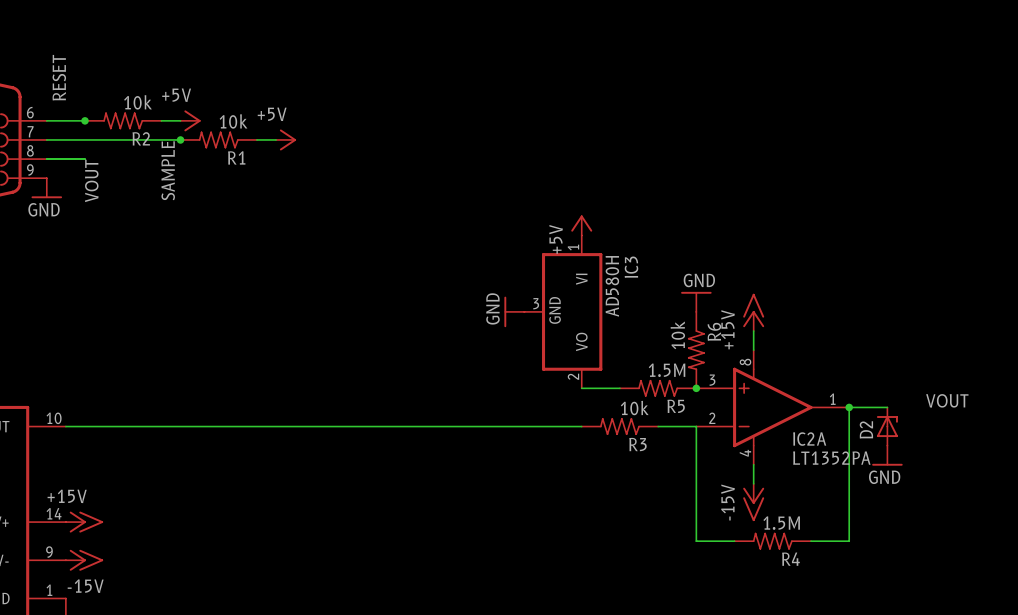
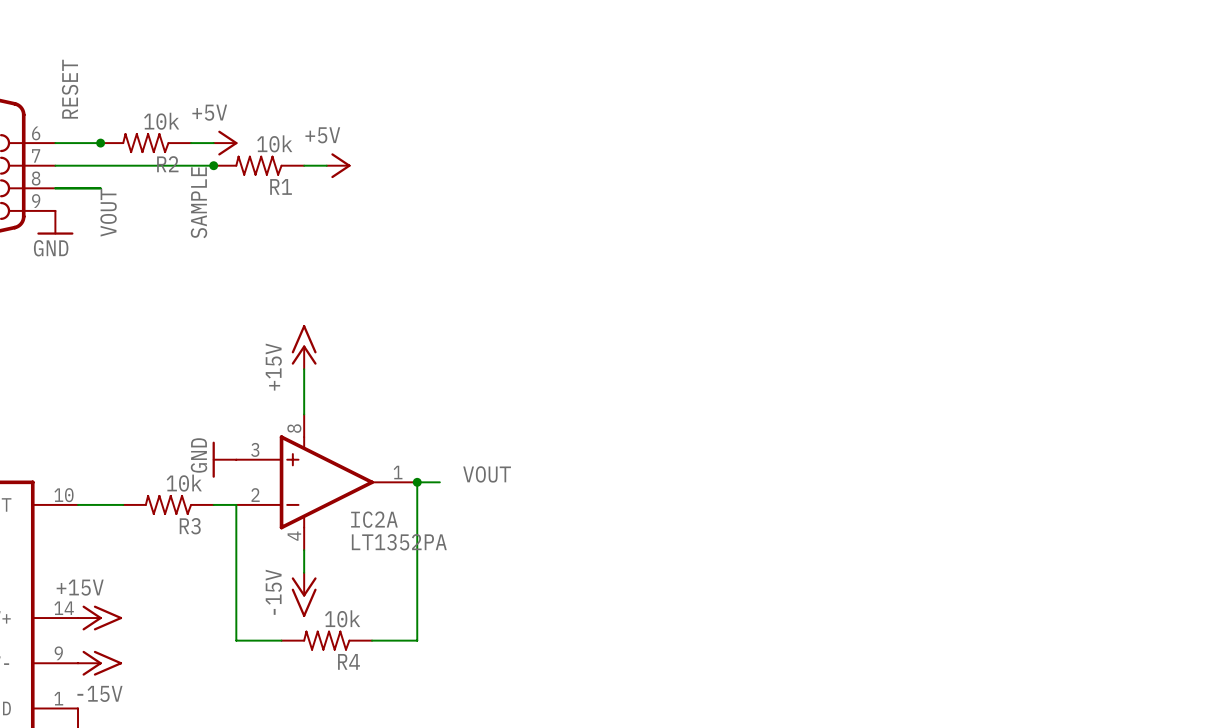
power symbol: +5V (581, 225) -> none
power symbol: none -> +15V (304, 347)
power symbol: GND (696, 301) -> none
wire: none -> (304, 369) (304, 414)
power symbol: GND (514, 311) -> none
IC3: AD580H (563, 311) -> none
power symbol: +15V (753, 312) -> none
wire: (753, 331) (753, 350) -> none
R6: 10k (696, 350) -> none
power symbol: none -> GND (224, 459)
wire: (581, 388) (619, 388) -> none
R5: 1.5M (658, 388) -> none
junction: (696, 388) -> none
label: none -> VOUT (487, 474)
label: VOUT (947, 400) -> none
junction: none -> (417, 482)
wire: none -> (439, 482) (417, 482) (417, 640) (372, 640)
IC2A position: (772, 407) -> (326, 482)
junction: (849, 407) -> none
wire: (887, 407) (849, 407) (849, 541) (810, 541) -> none
wire: (199, 426) (581, 426) -> (236, 504) (236, 640) (281, 640)
R3 position: (619, 426) -> (168, 504)
wire: (658, 426) (696, 426) (696, 541) (734, 541) -> none
D2: (887, 426) -> none
power symbol: GND (887, 455) -> none
wire: none -> (304, 550) (304, 572)
wire: (753, 464) (753, 483) -> none
power symbol: none -> -15V (304, 594)
power symbol: -15V (753, 502) -> none
R4 value: 1.5M (781, 523) -> 10k (342, 618)
R4 position: (772, 541) -> (326, 640)

